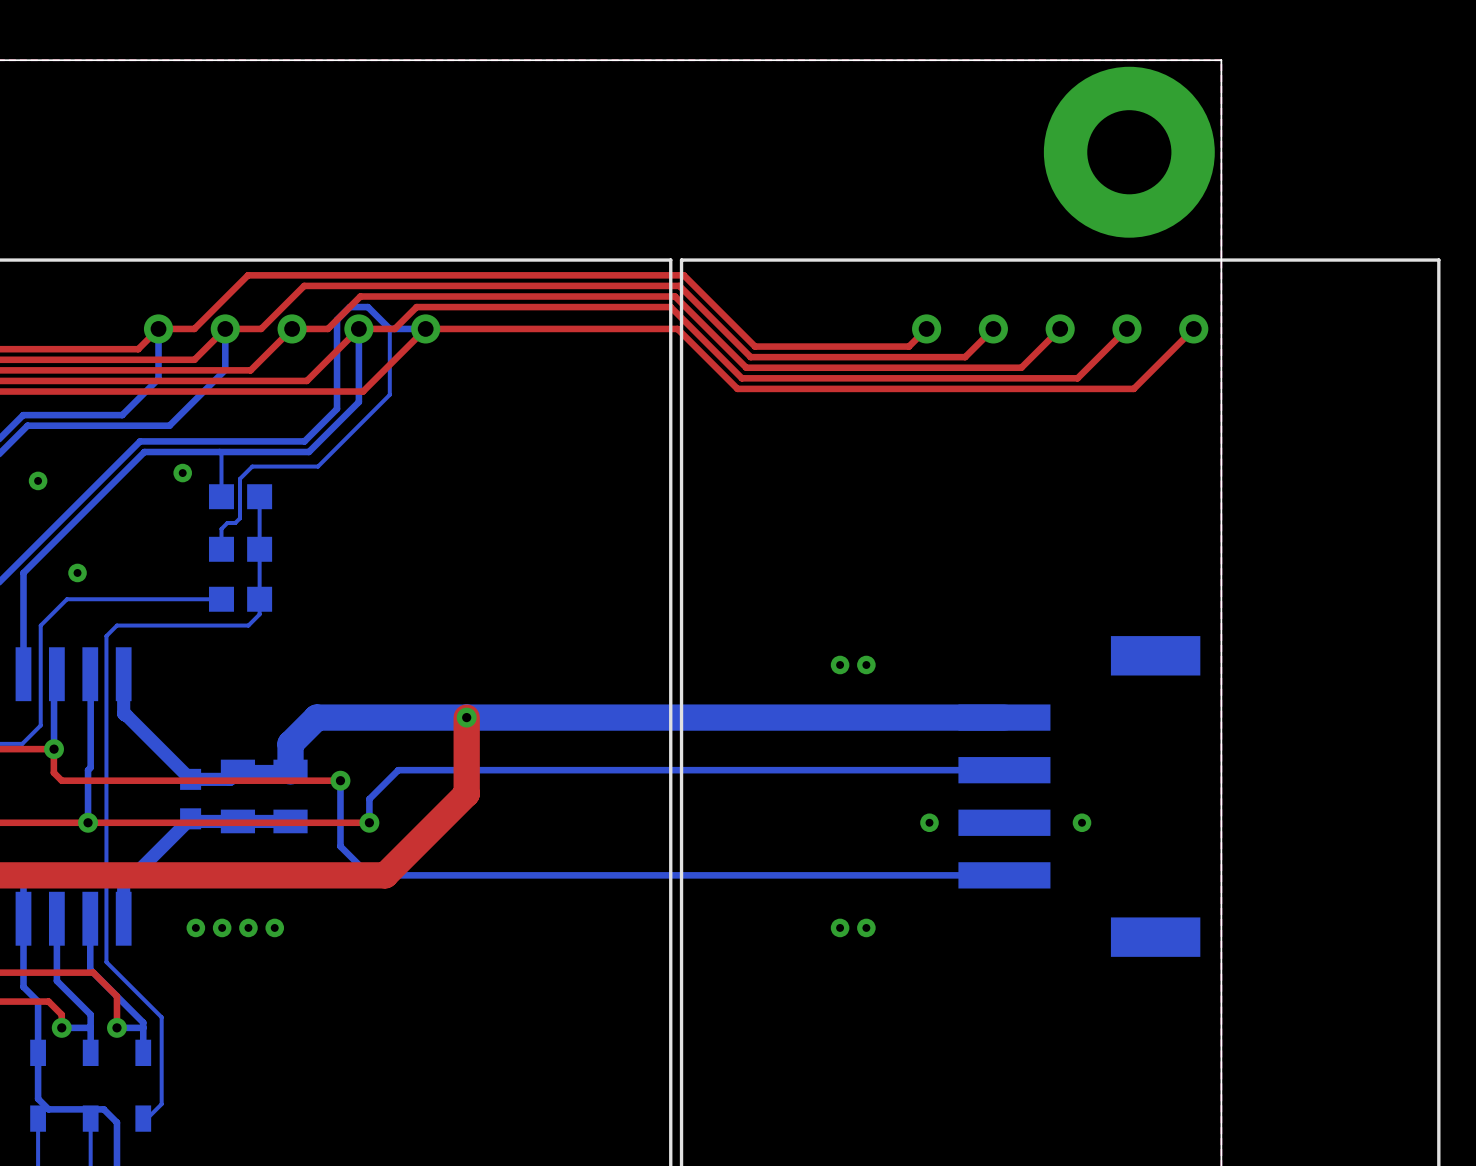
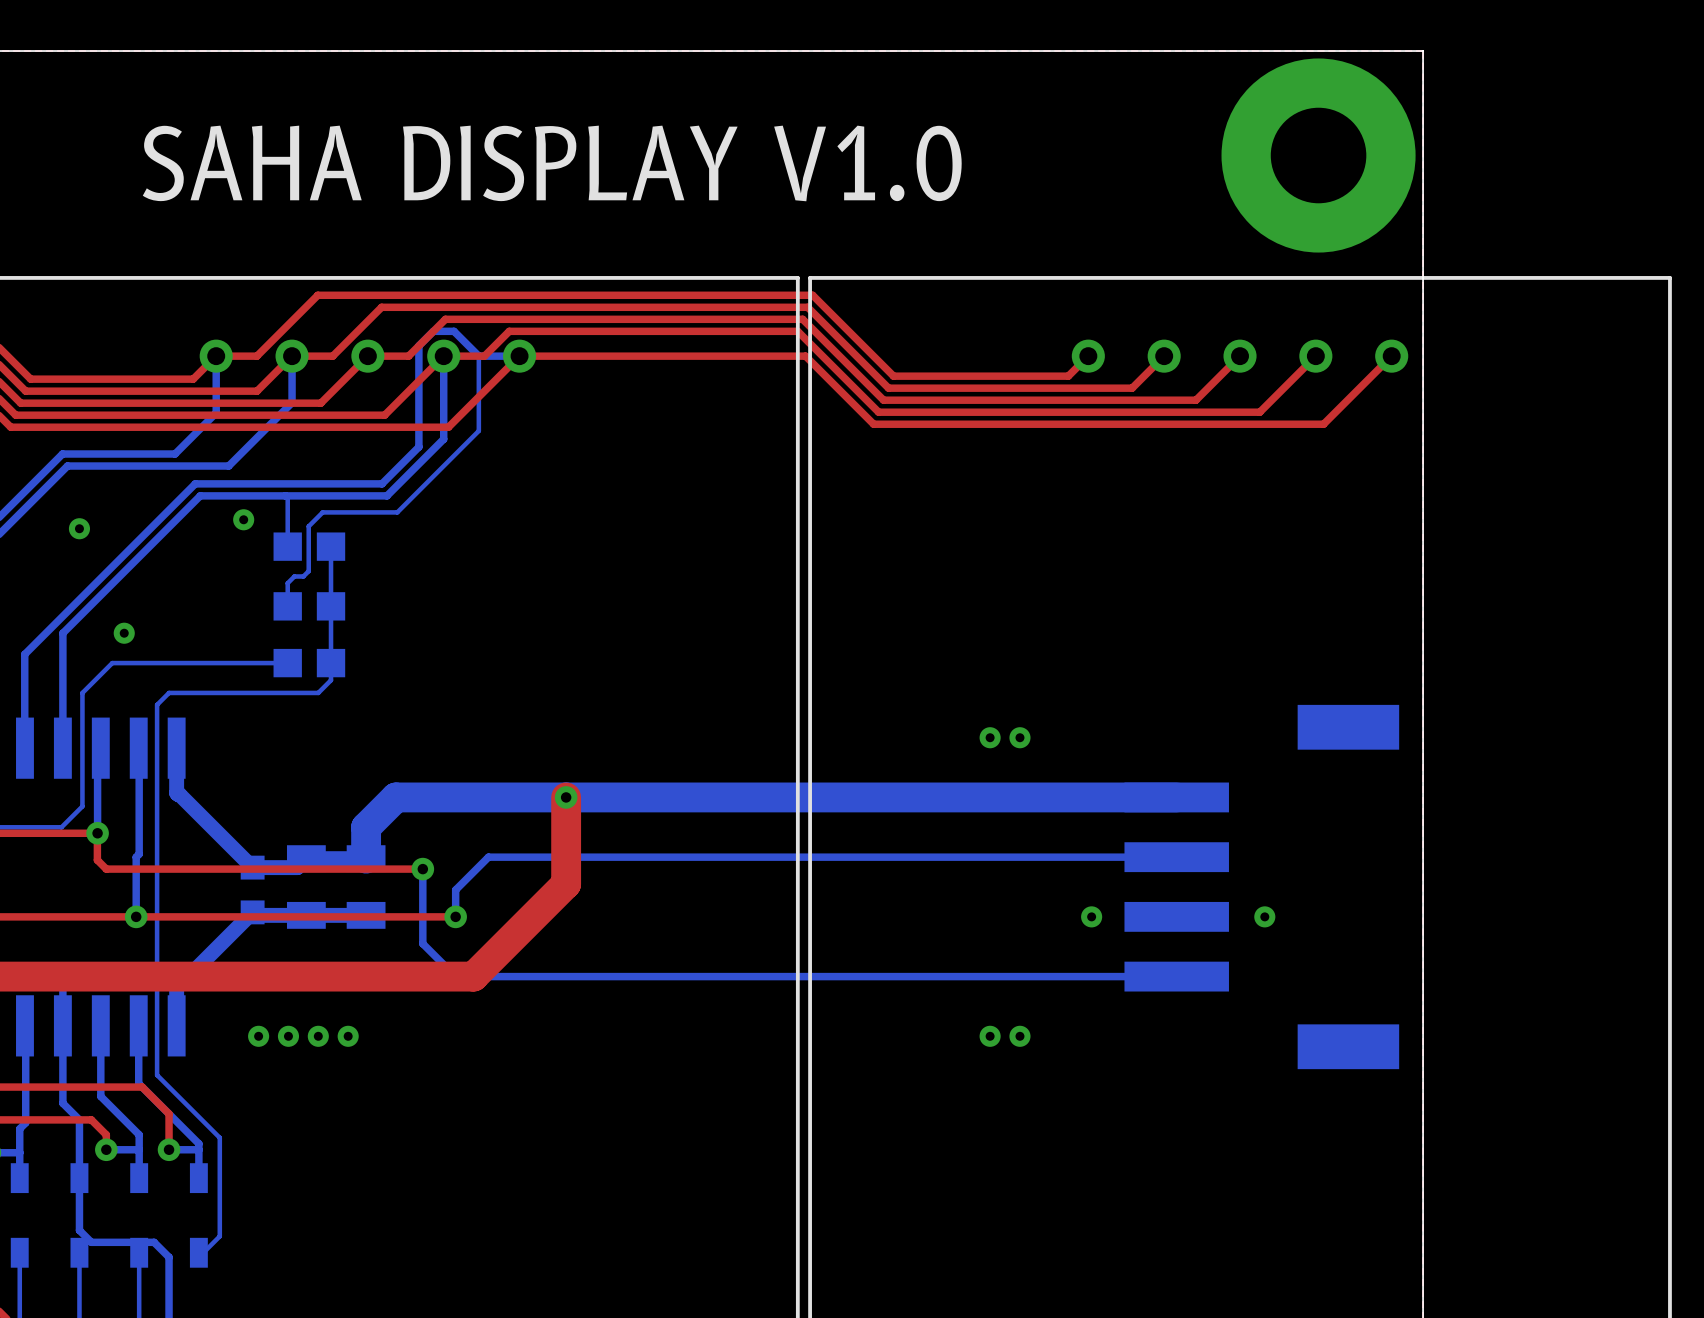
text: none -> SAHA DISPLAY V1.0 (552, 163)

